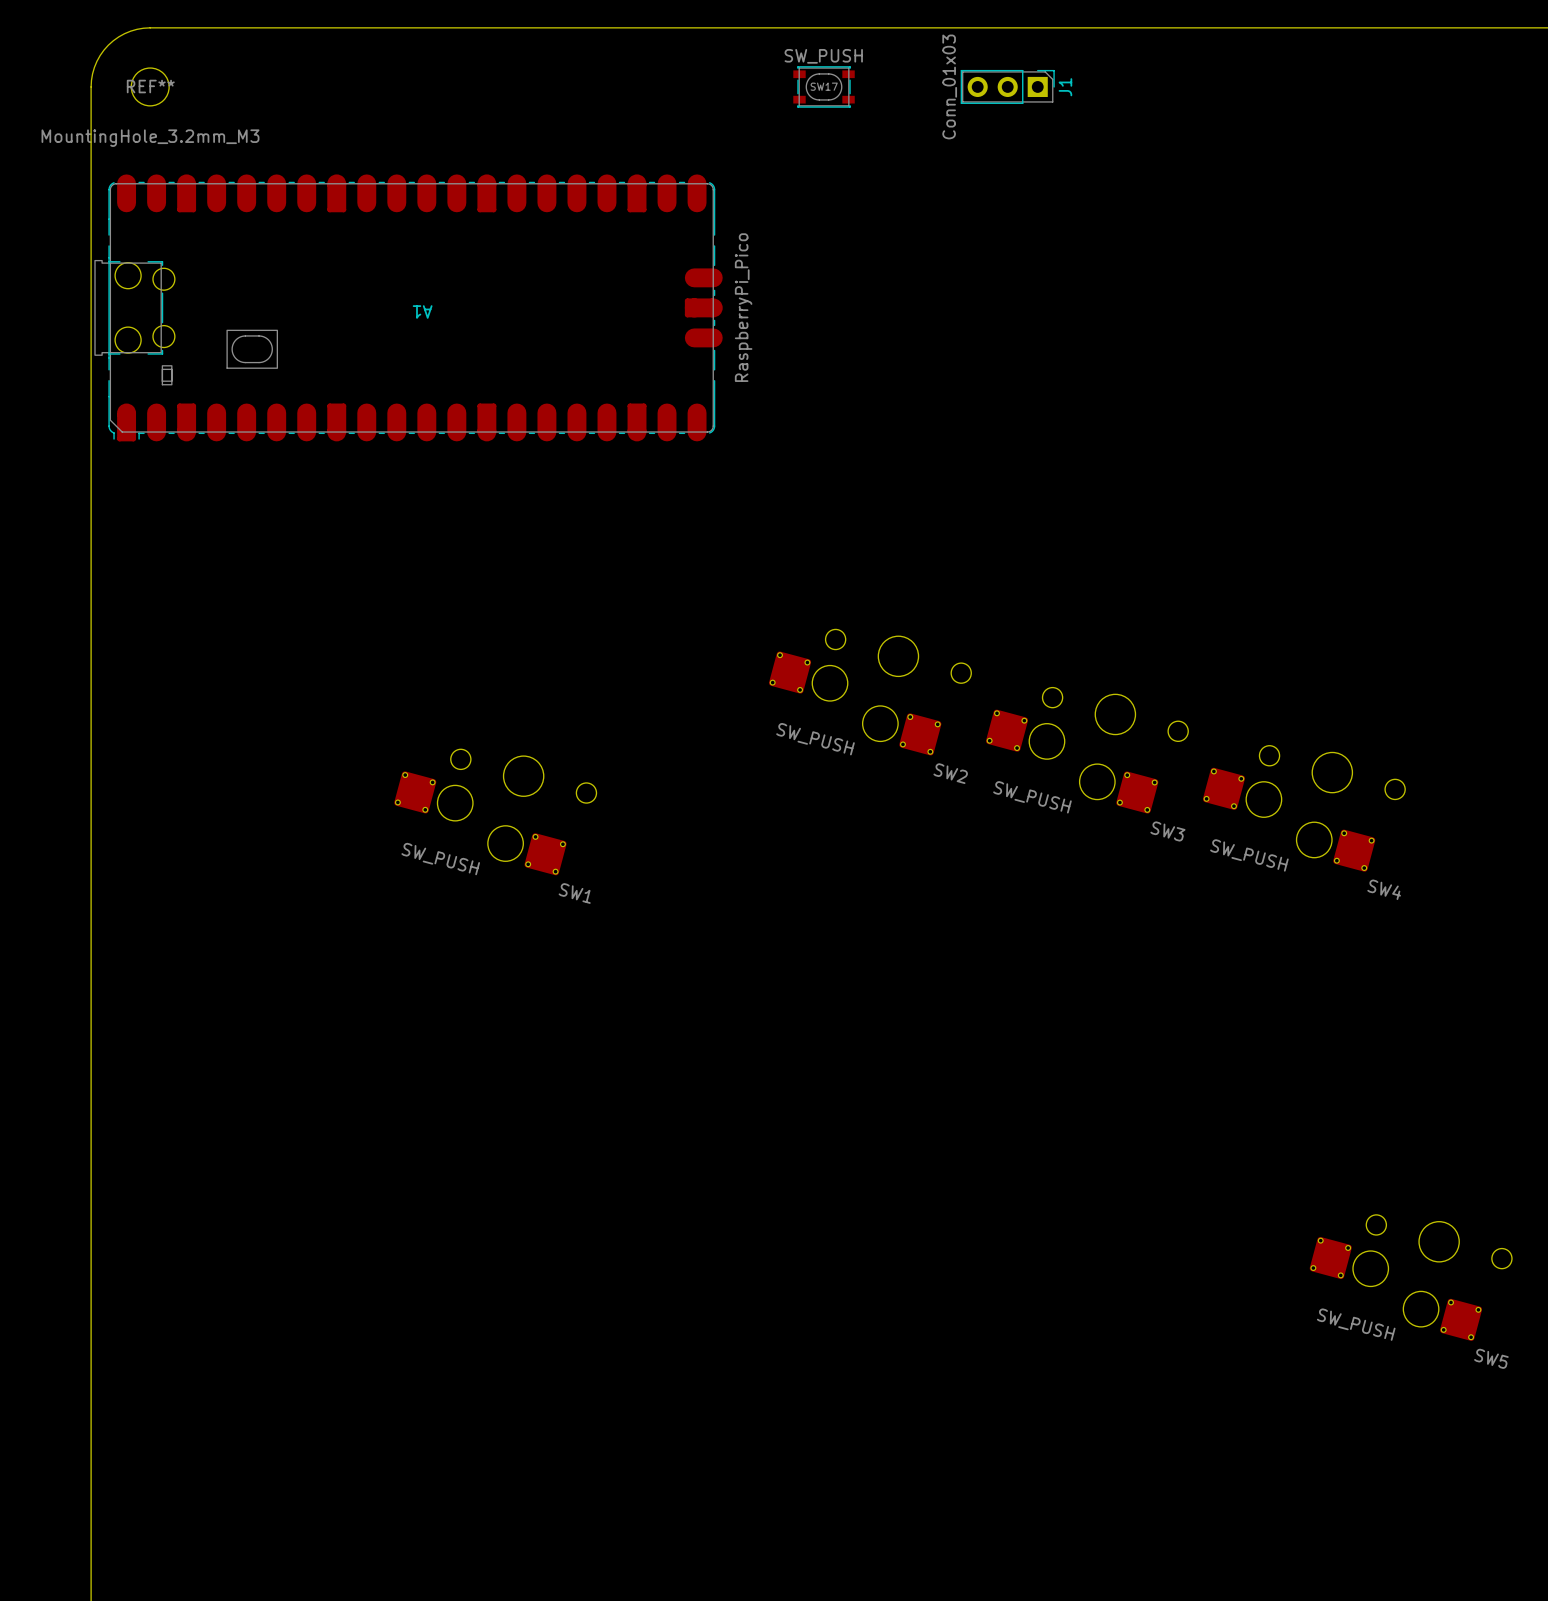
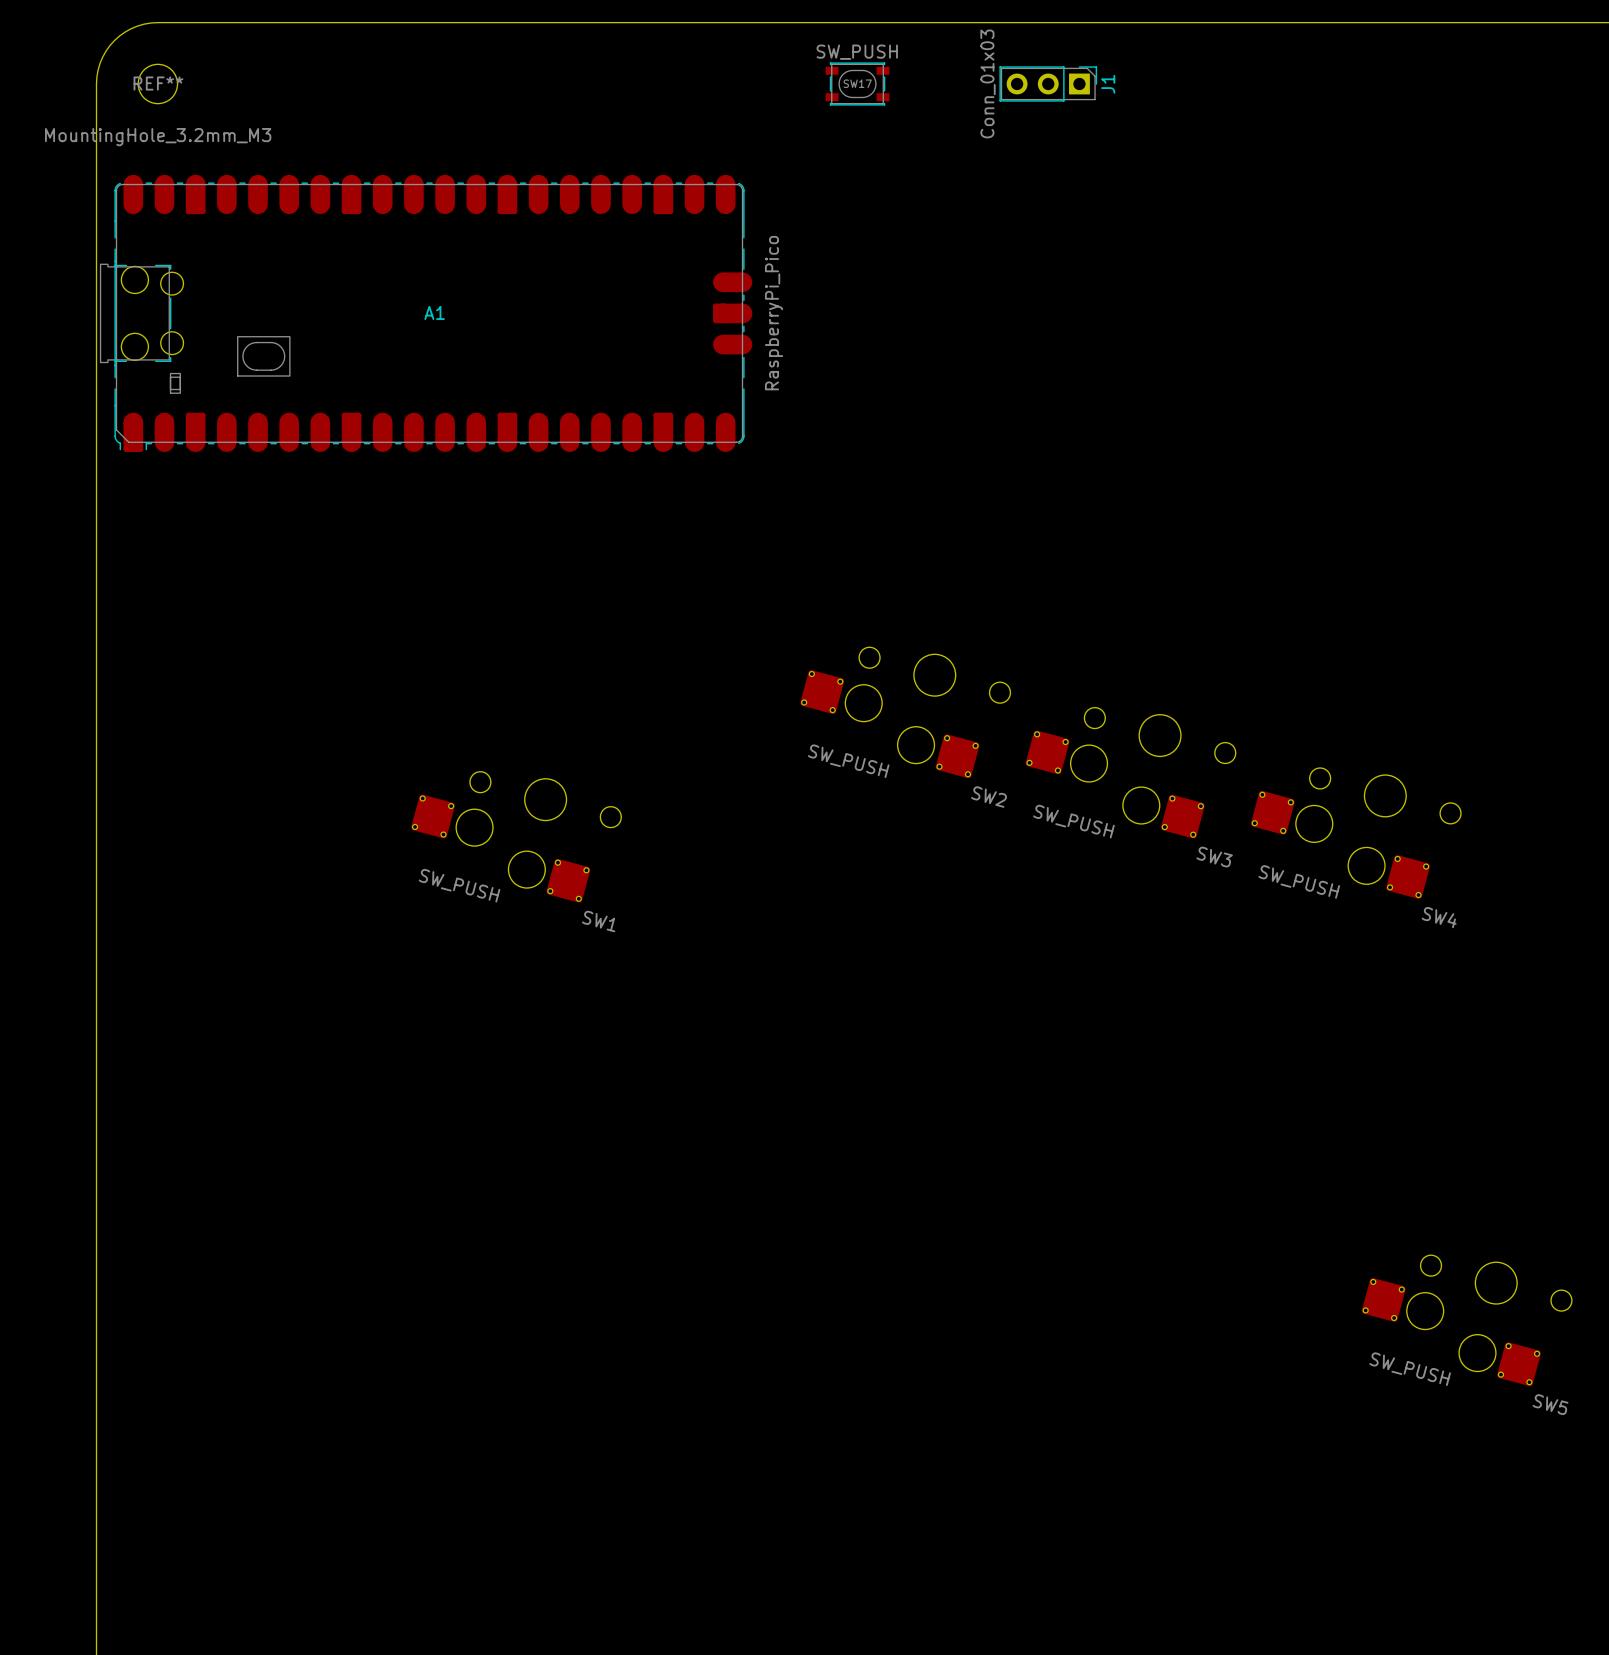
A1 name rotation: 0° (422, 312) -> 180° (434, 312)

